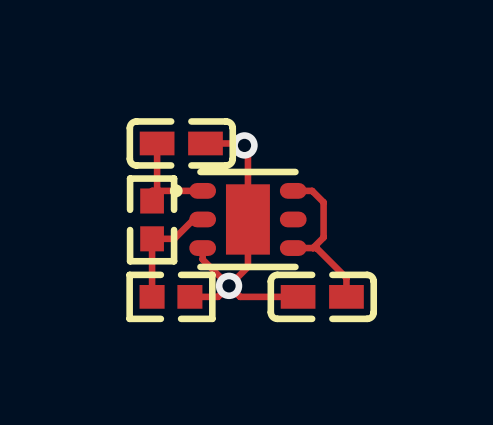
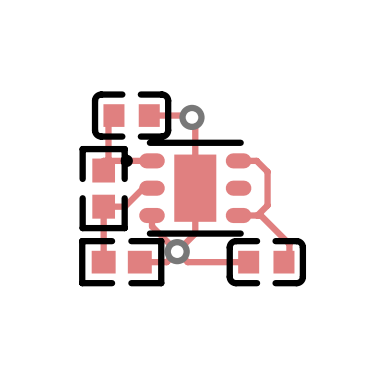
part footprint: [126, 118, 237, 169] -> [91, 91, 172, 140]
part footprint: [267, 271, 378, 323] -> [226, 237, 307, 287]

